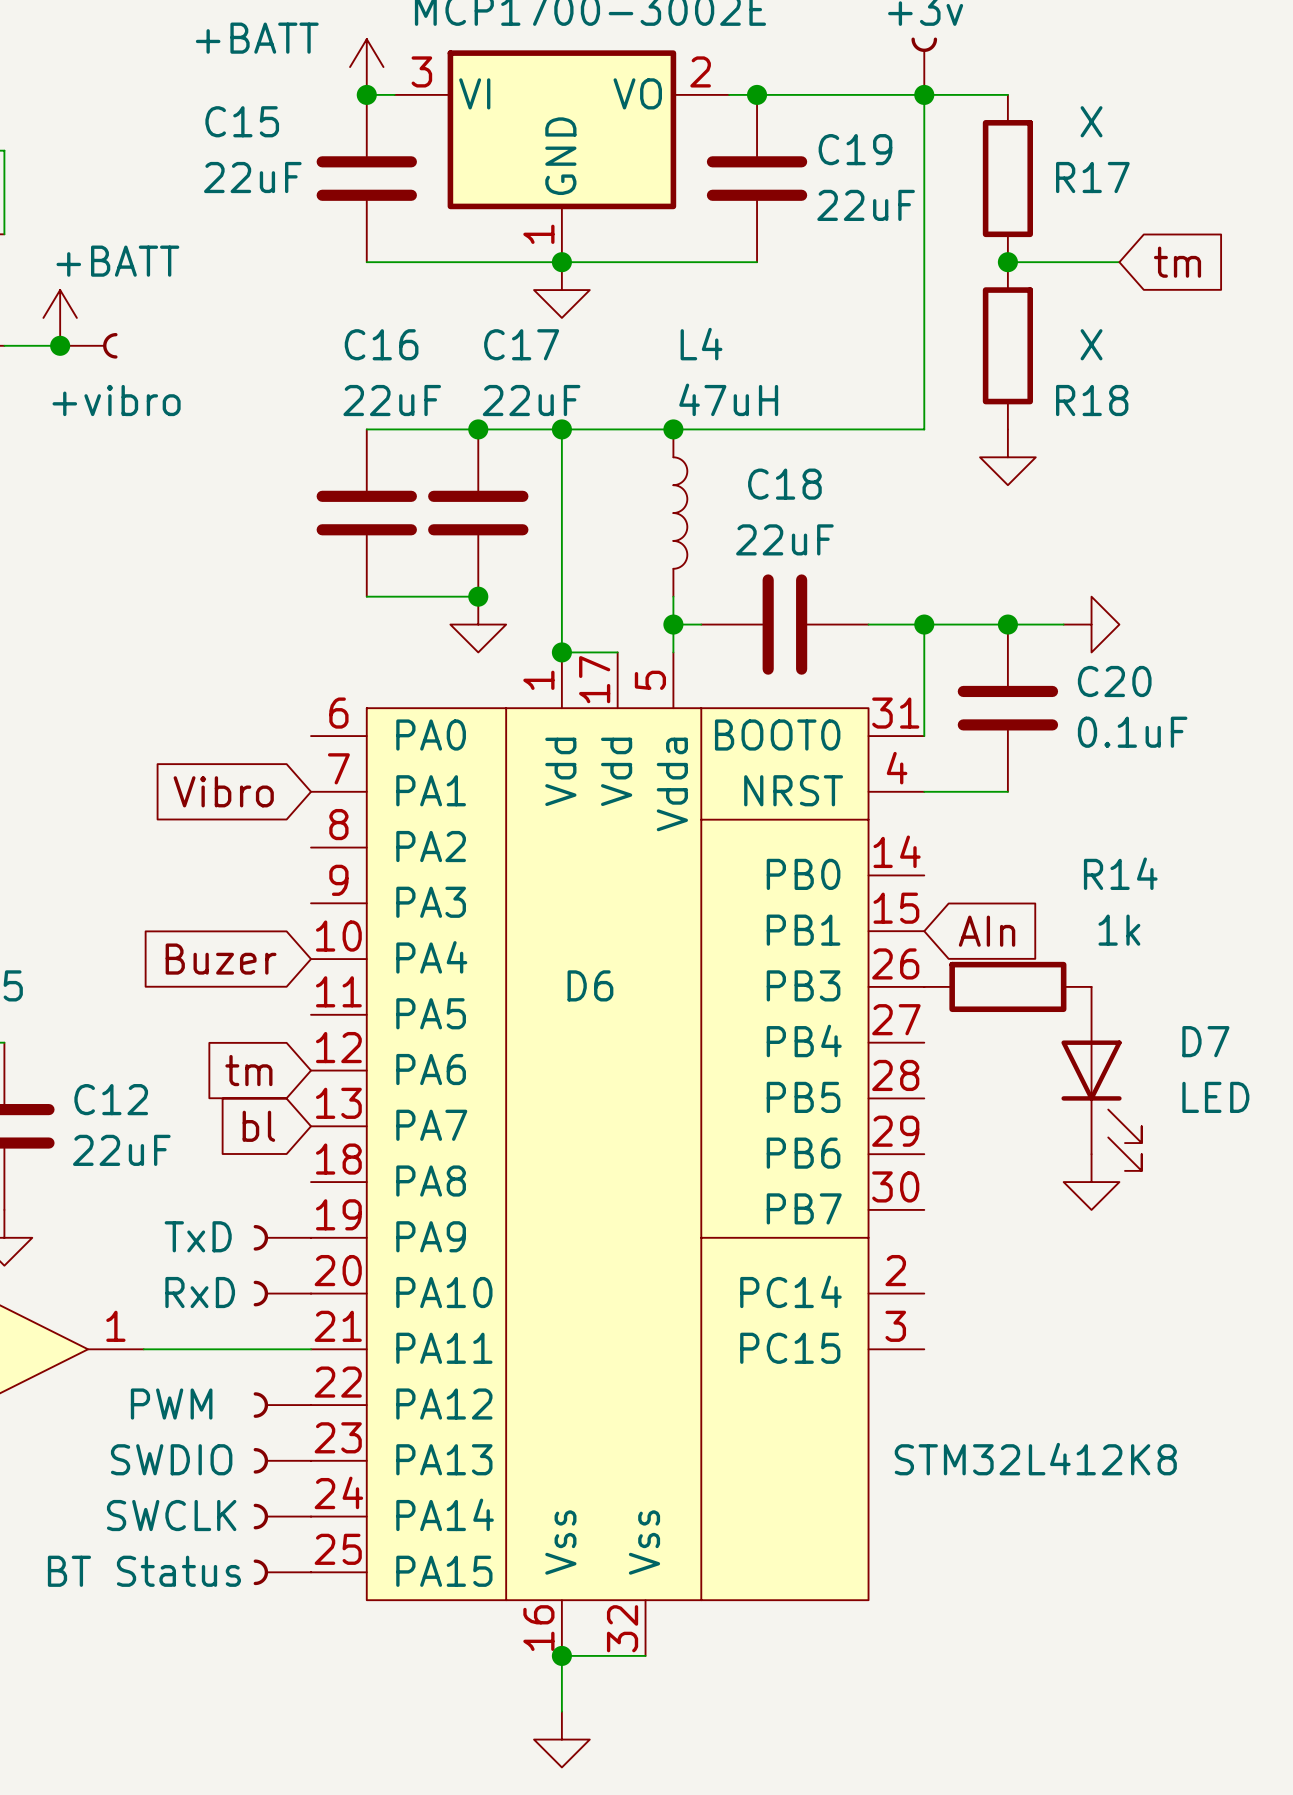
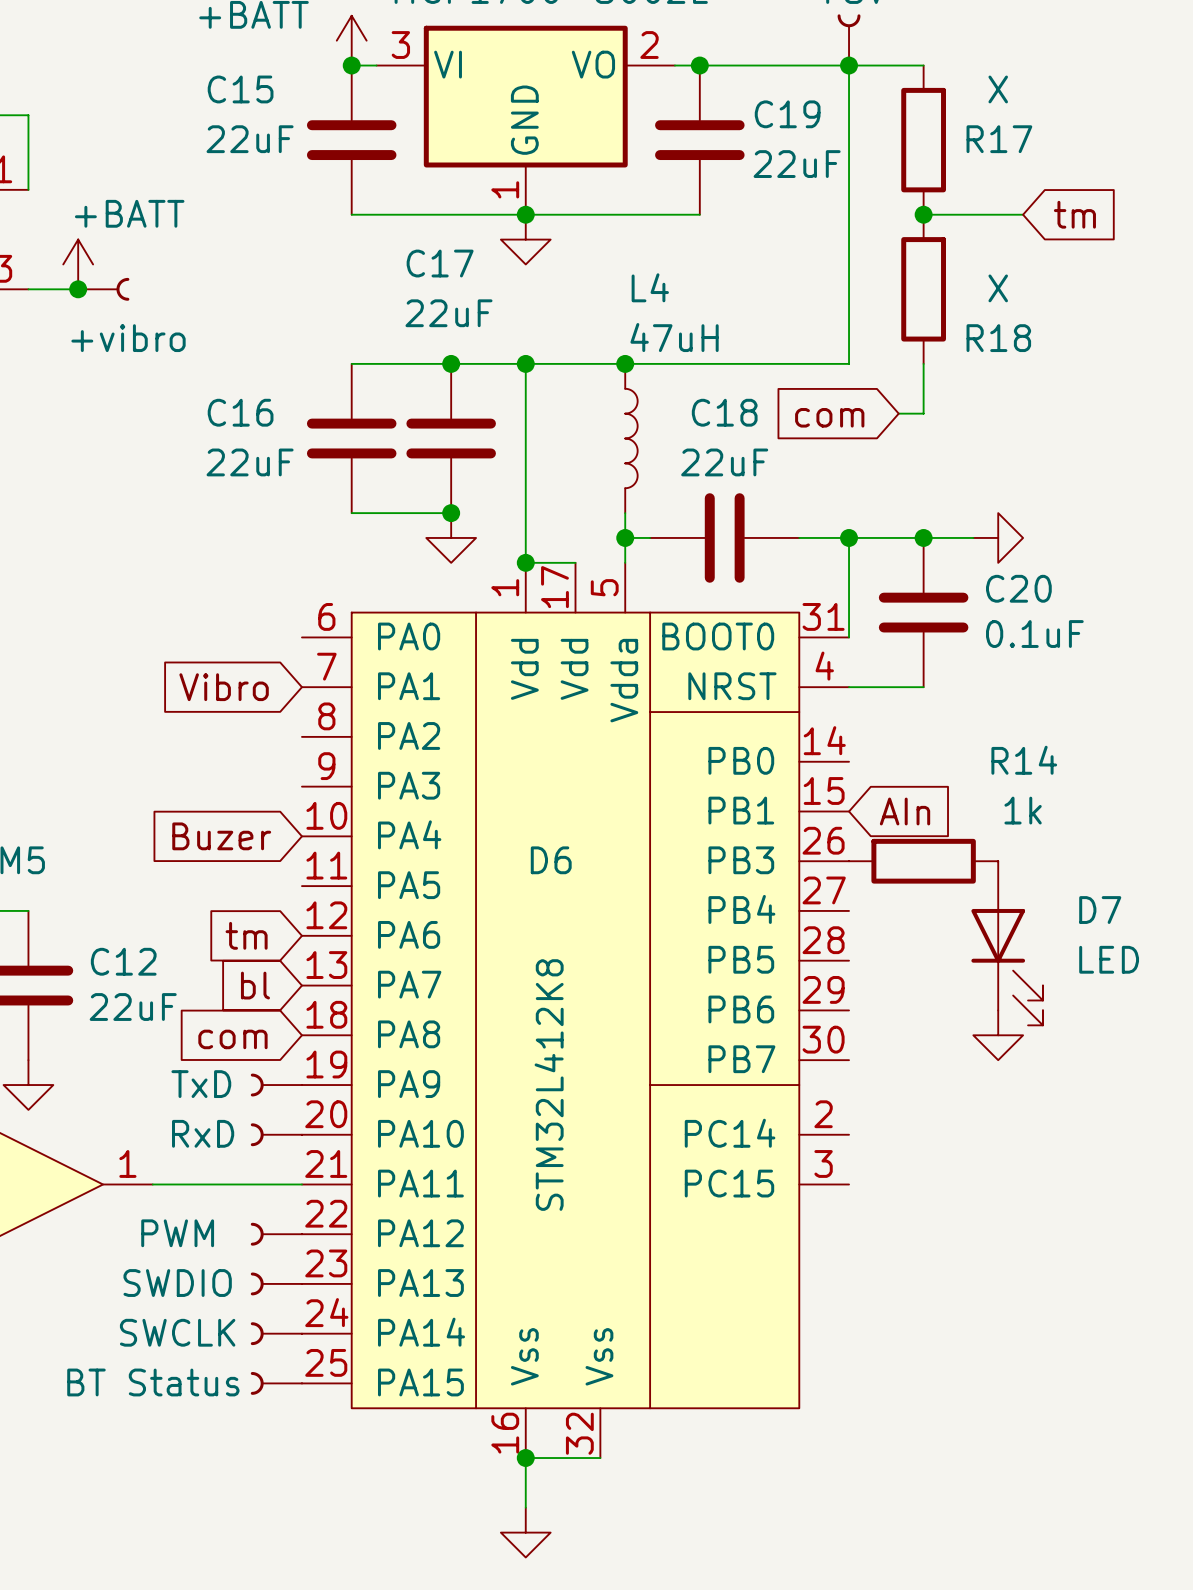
C16 name position: C16 (381, 344) -> C16 (240, 412)
C17 name position: C17 (521, 344) -> C17 (440, 263)
C16 value position: 22uF (392, 400) -> 22uF (250, 462)
C17 value position: 22uF (531, 400) -> 22uF (448, 313)
wire: none -> (923, 363) (923, 413) (898, 413)
power symbol: (1007, 457) -> none
global label: none -> com (829, 417)
global label: none -> com (232, 1039)
D6 value rotation: 0° (1035, 1459) -> 90° counterclockwise (549, 1085)
D6 value position: STM32L412K8 (1035, 1459) -> STM32L412K8 (549, 1085)

